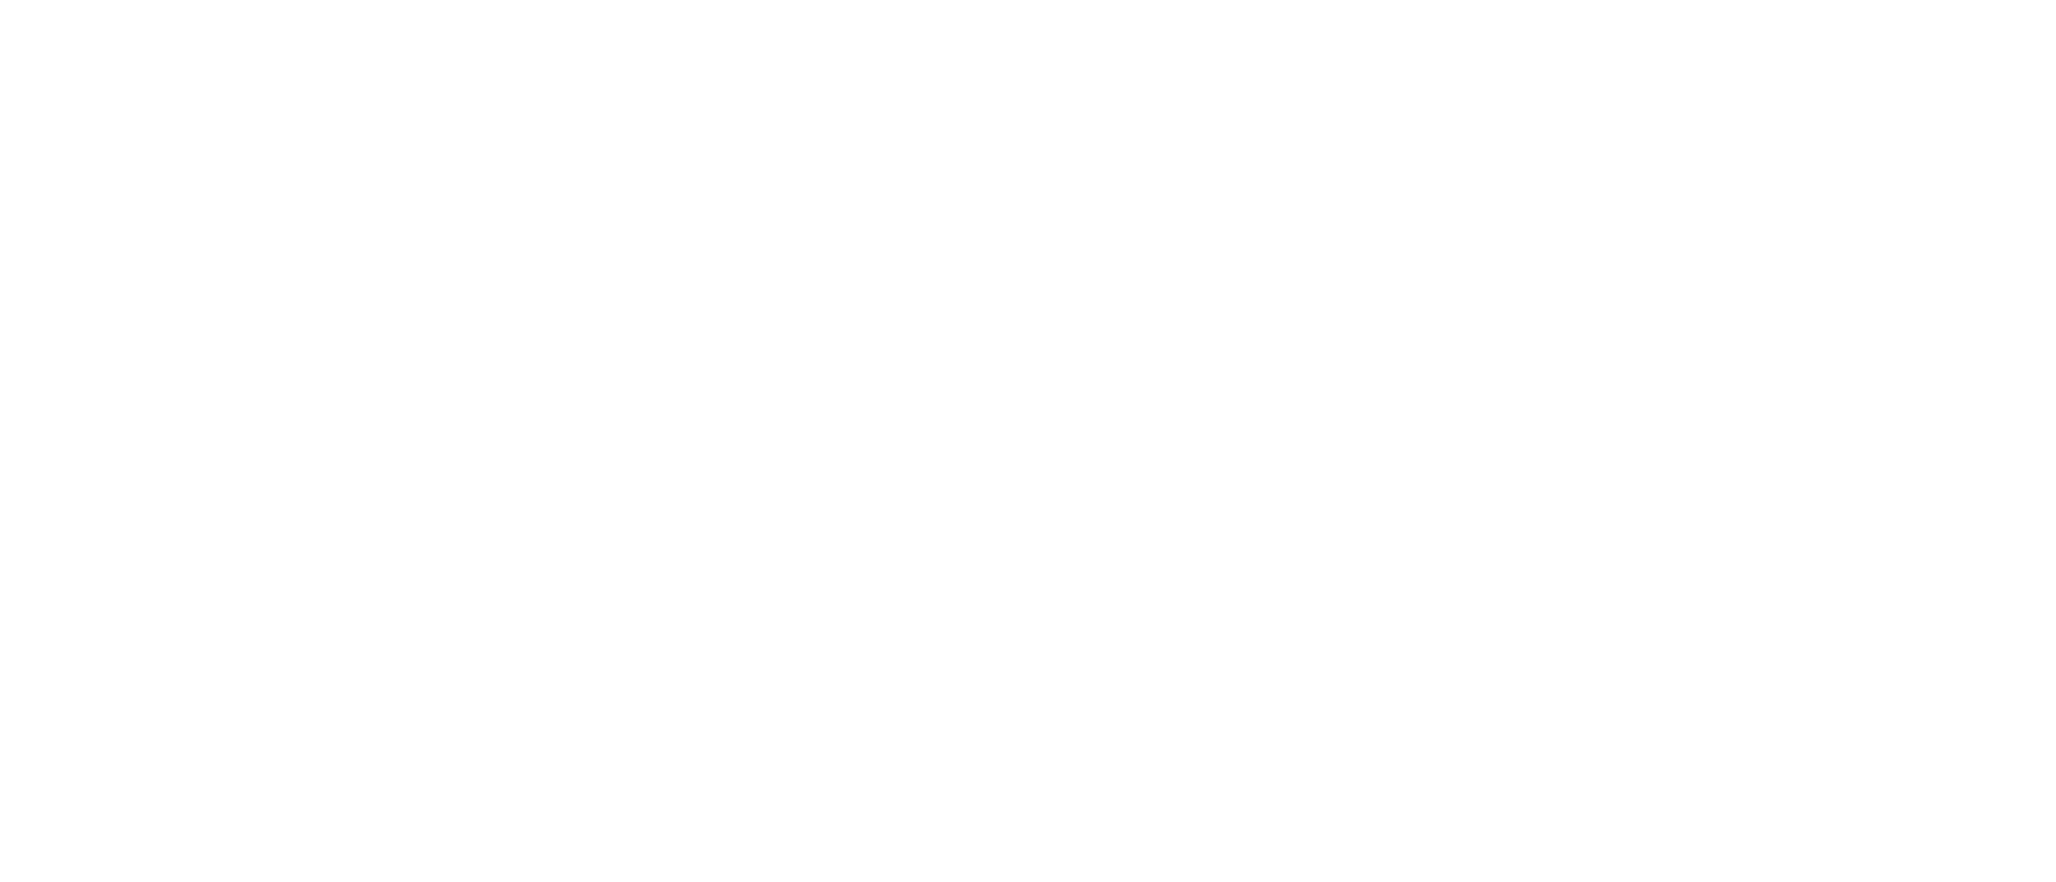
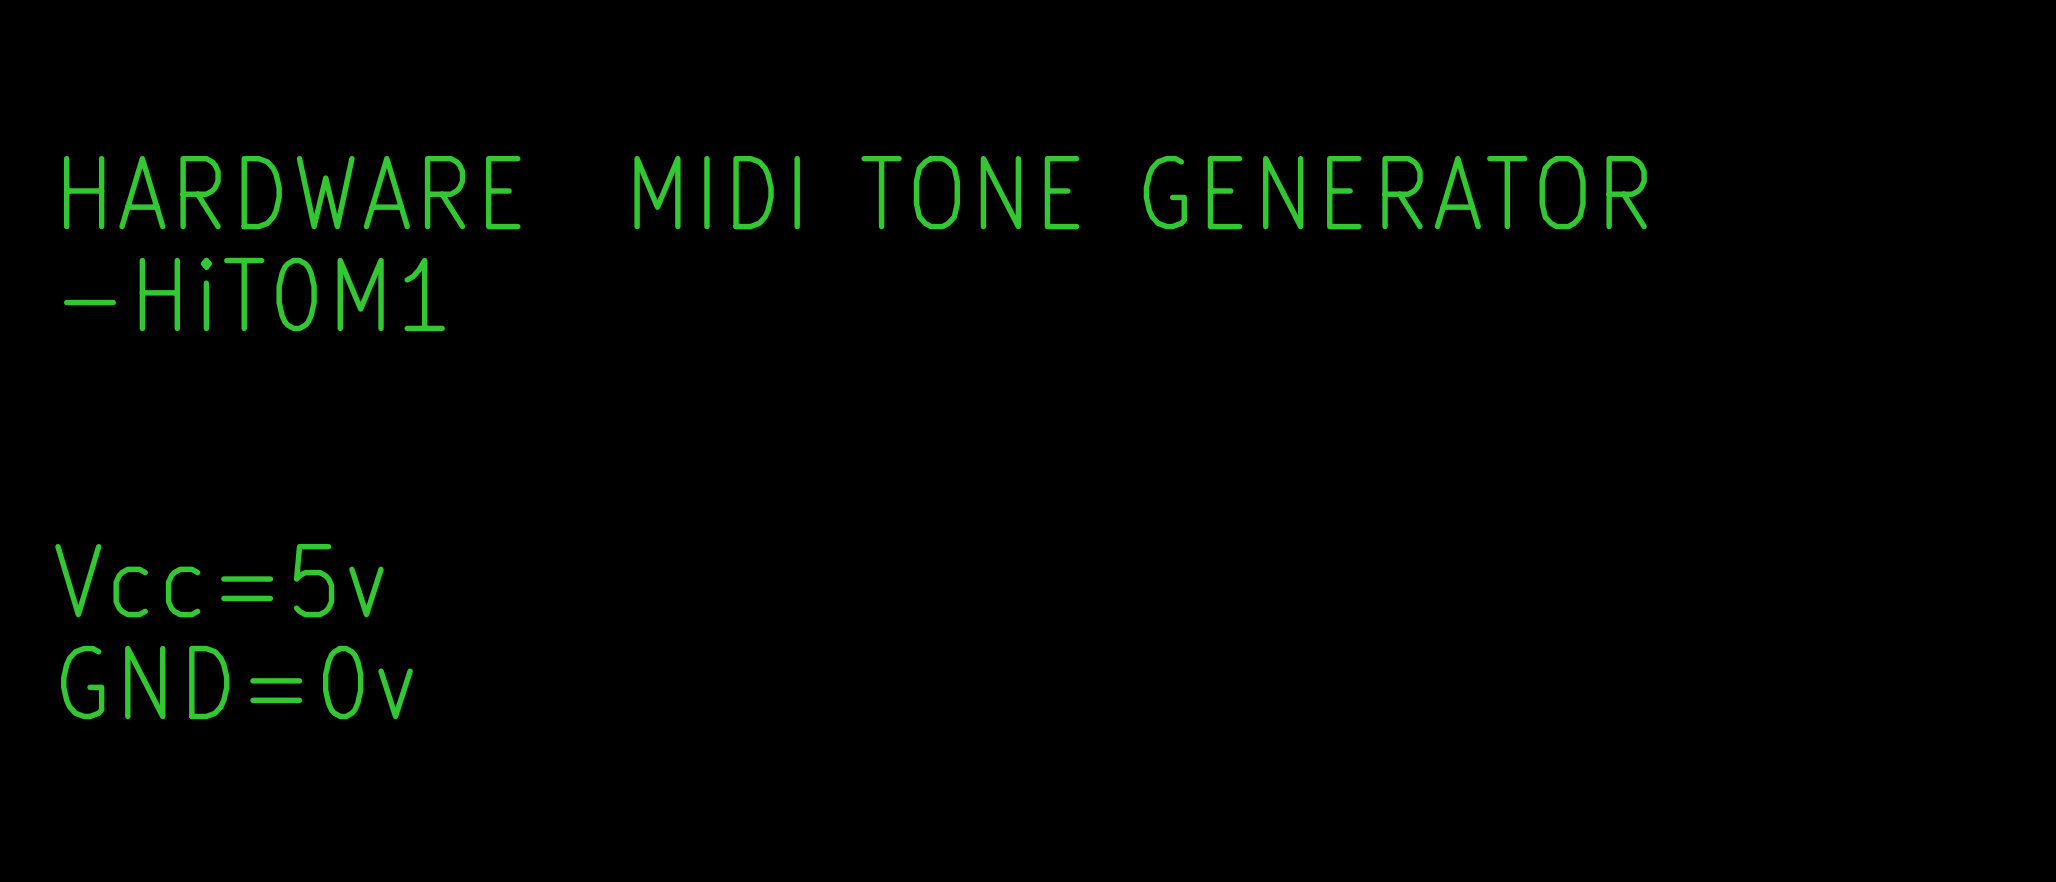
text: none -> HARDWARE MIDI TONE GENERATOR (855, 192)
text: none -> -HiT0M1 (254, 294)
text: none -> Vcc=5v (219, 580)
text: none -> GND=0v (236, 682)

